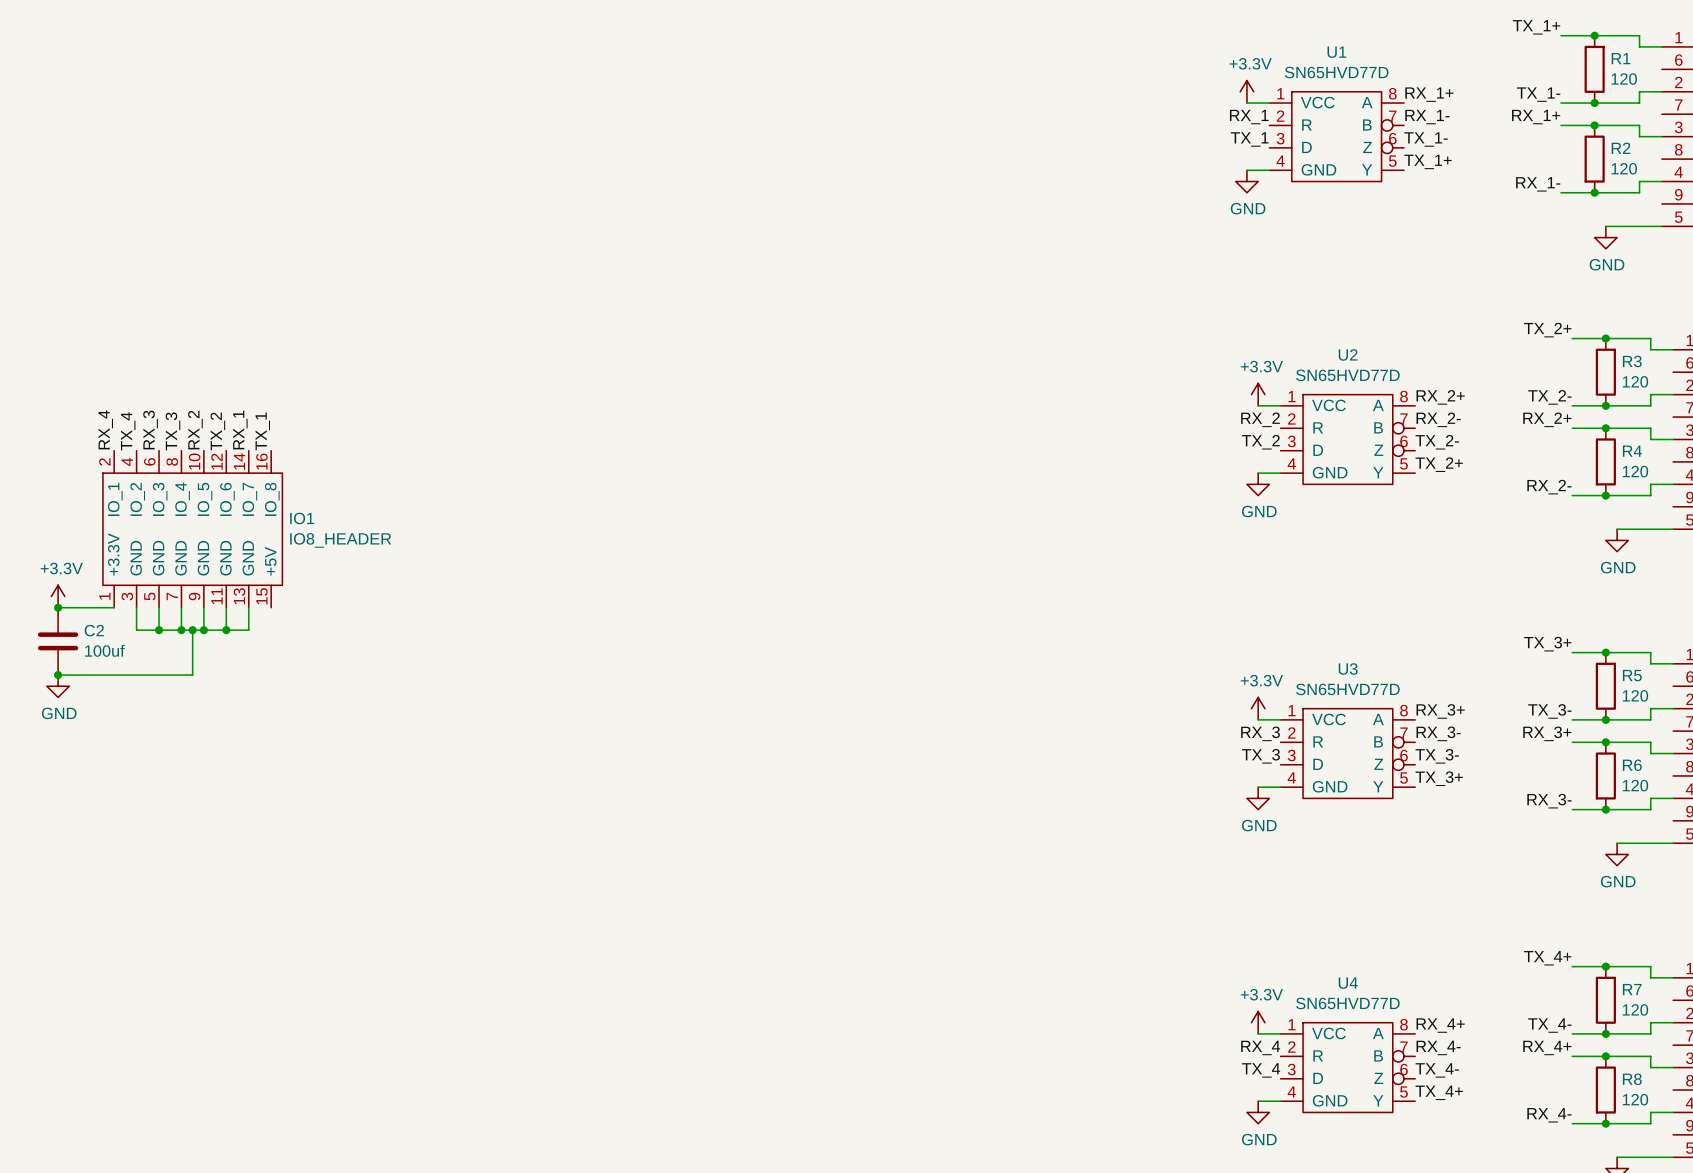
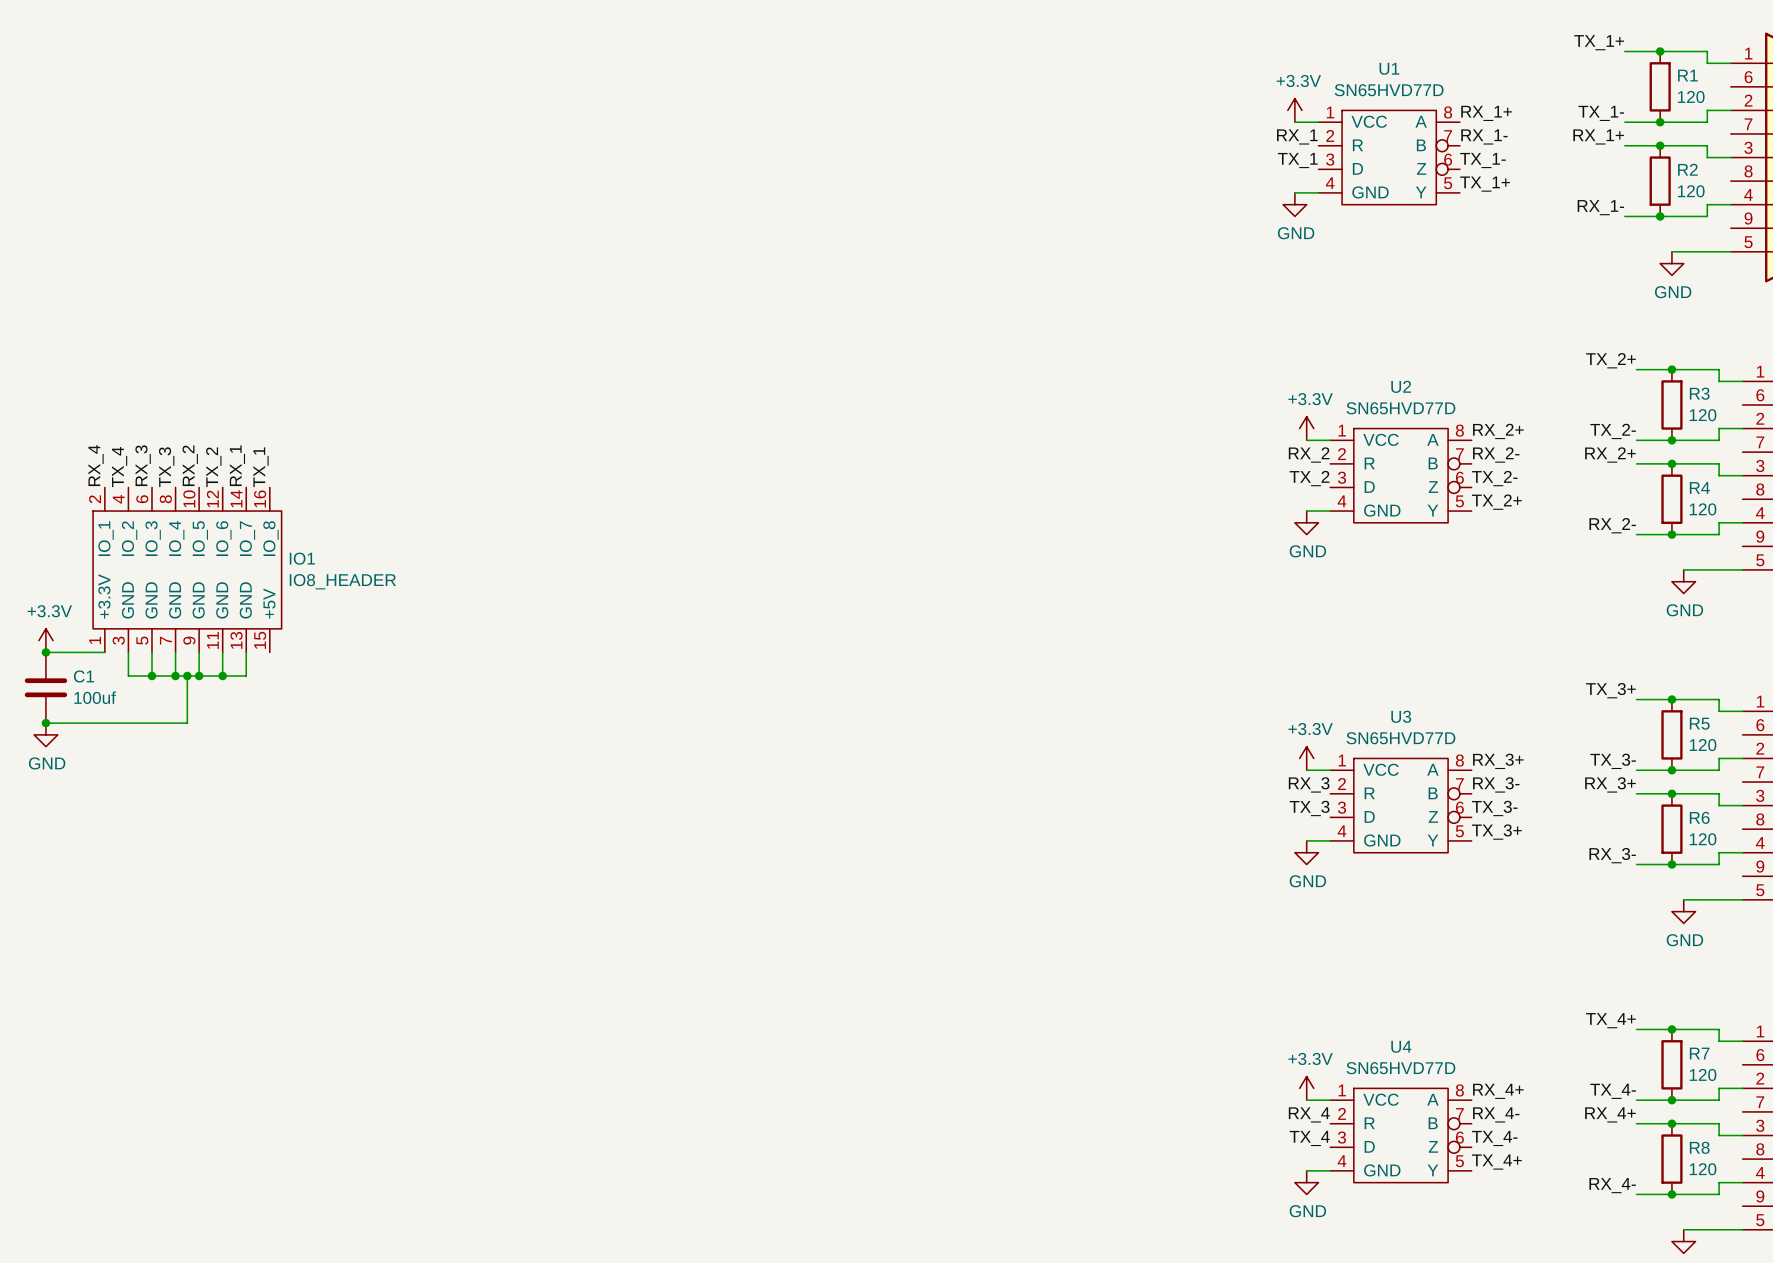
C2 name: C2 (94, 630) -> C1 (84, 676)

